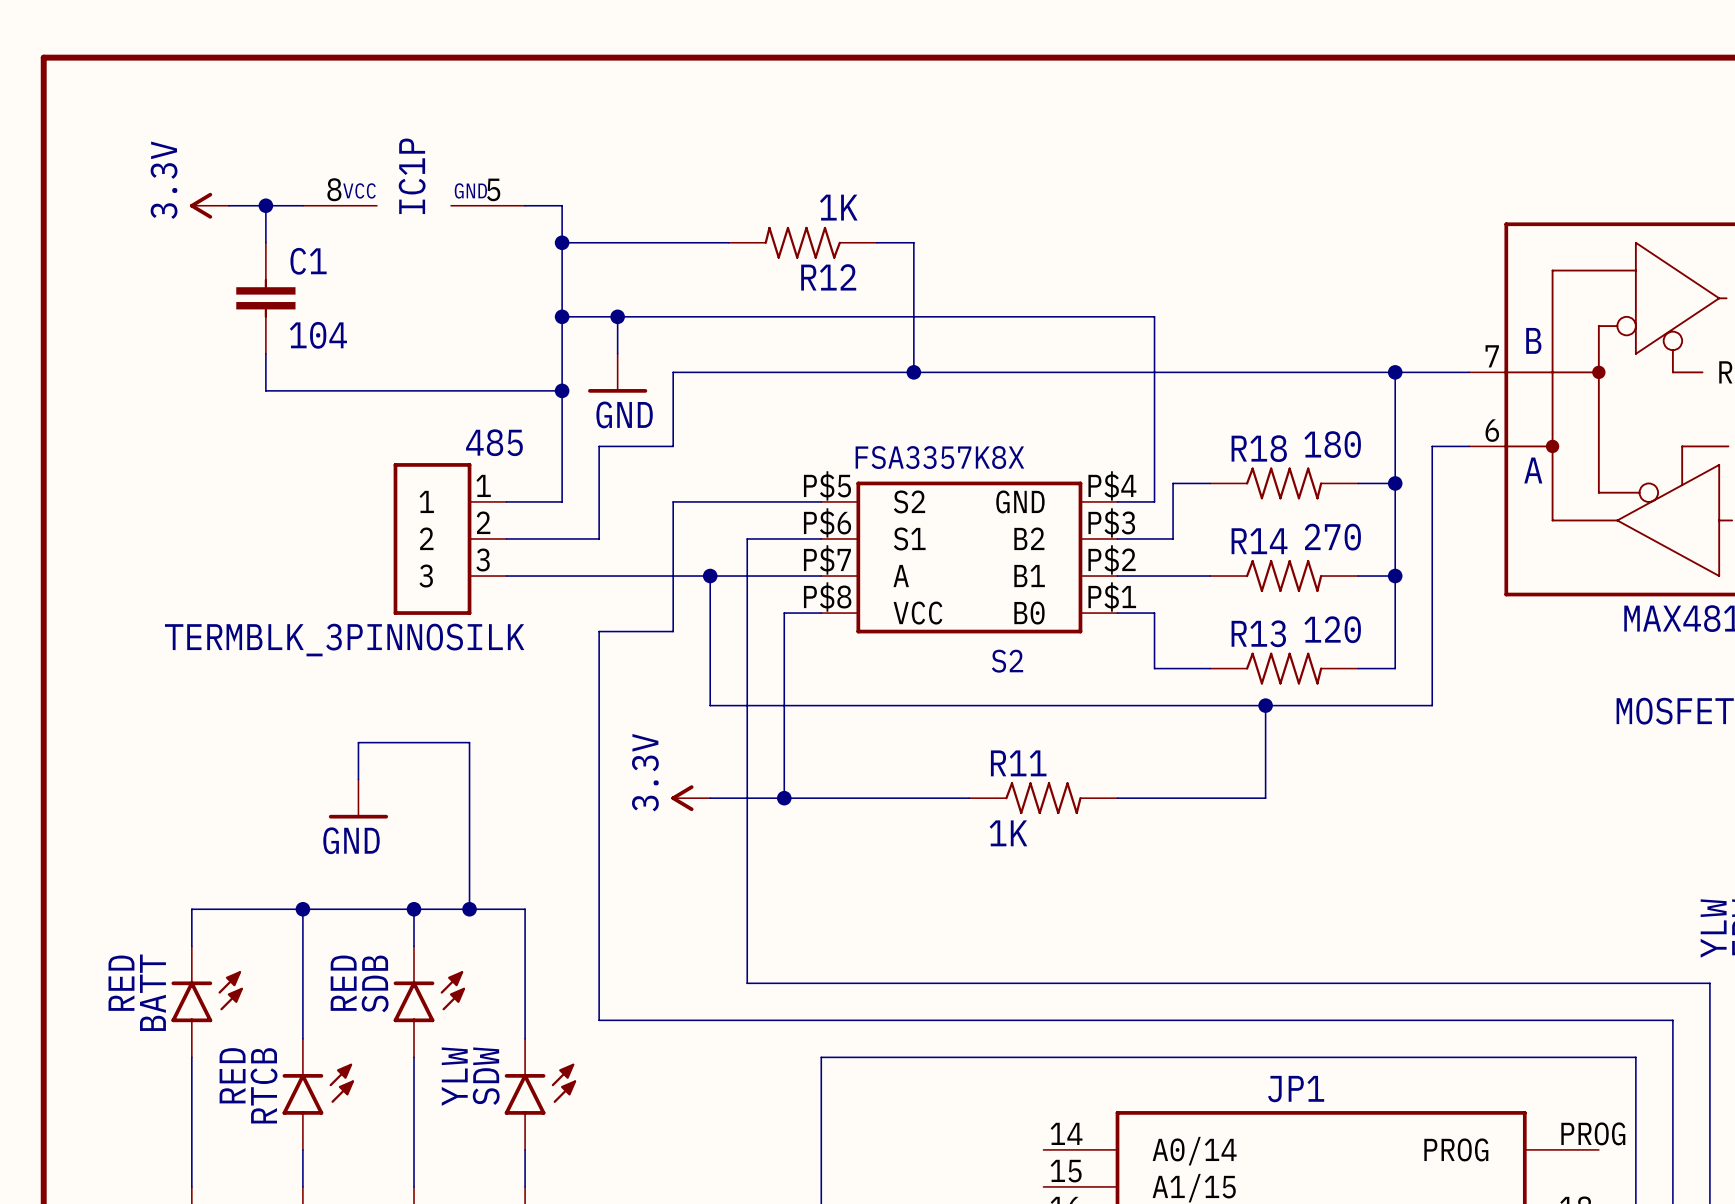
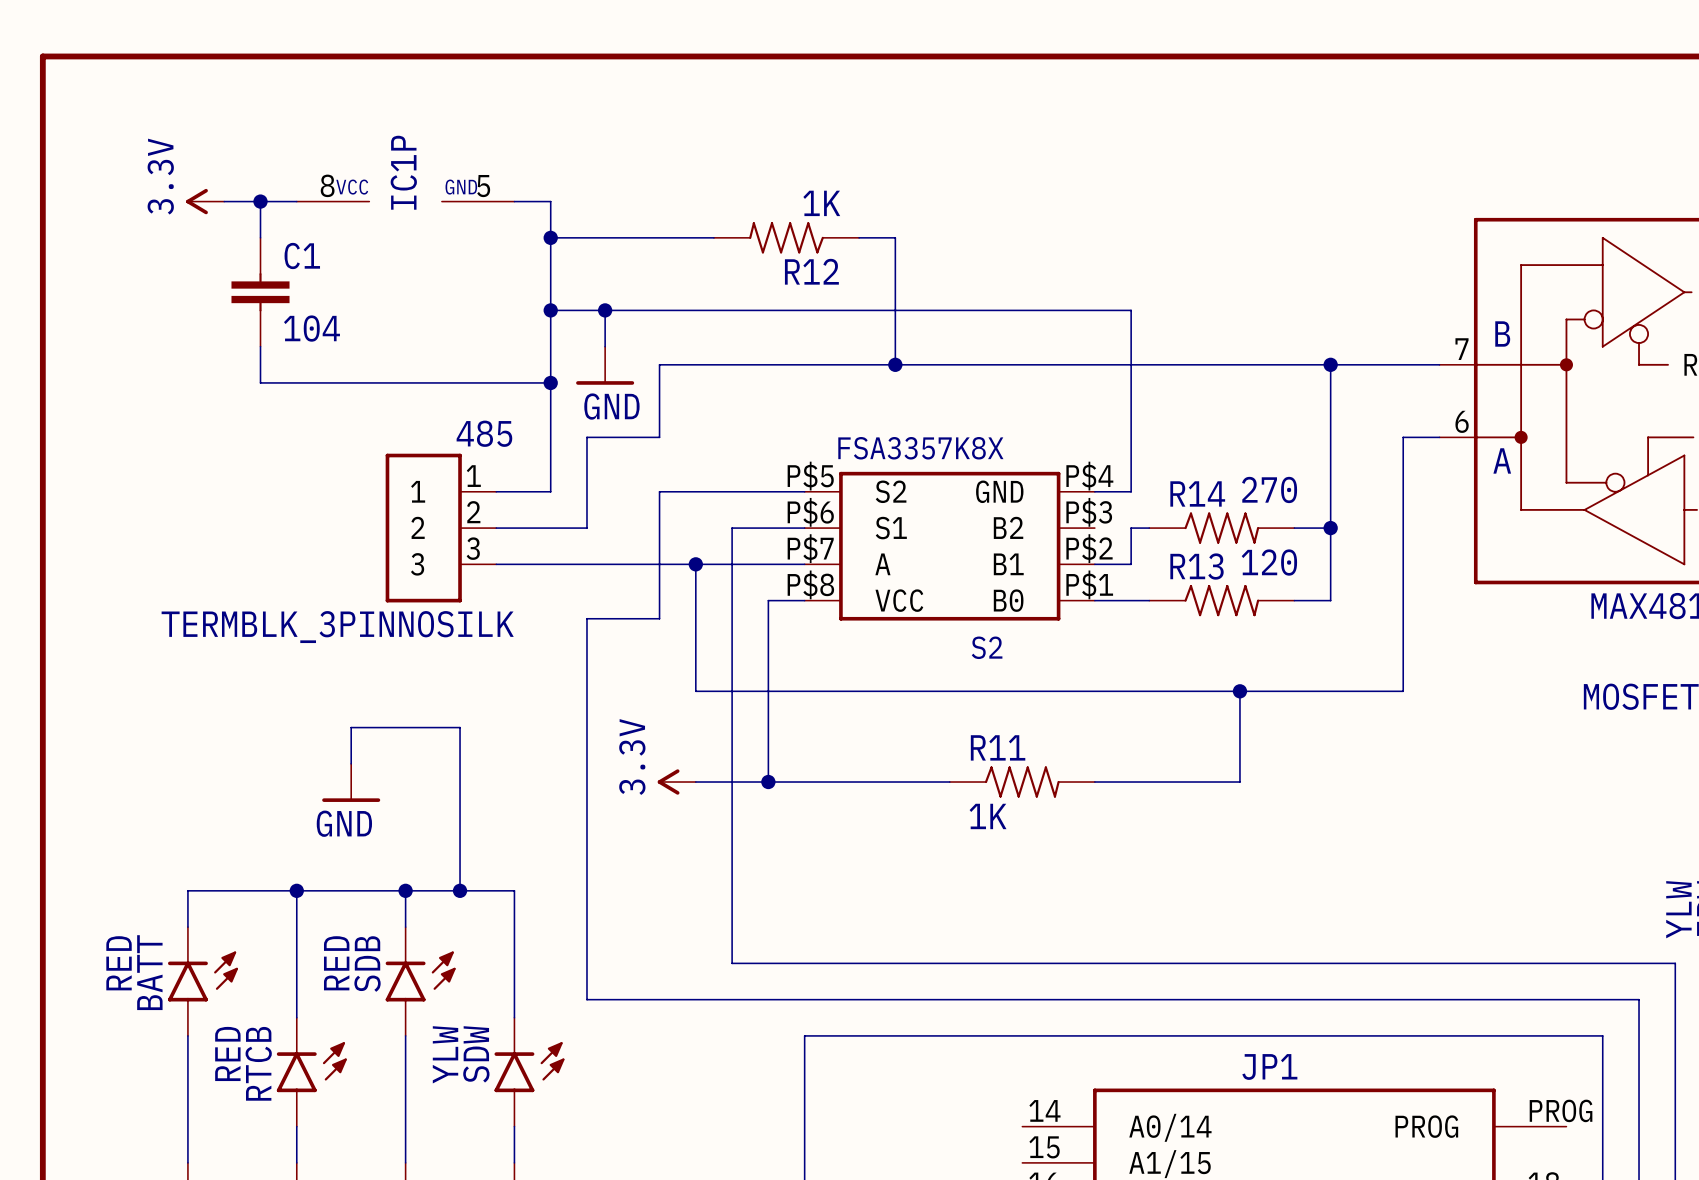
wire: none -> (1330, 364) (1330, 600) (1294, 600)
wire: (1395, 372) (1395, 668) (1358, 668) -> none
junction position: (1395, 372) -> (1330, 364)
wire: (1210, 483) (1173, 483) (1173, 538) -> none
R18: 180 (1284, 483) -> none
wire: (1358, 483) (1395, 483) -> none
junction: (1395, 483) -> none
wire: (1117, 538) (1154, 538) -> (1131, 564) (1131, 528)
junction: none -> (1330, 528)
wire: (1154, 576) (1210, 576) -> none
R14 position: (1284, 576) -> (1221, 528)
wire: (1358, 576) (1395, 576) -> (1294, 528) (1330, 528)
junction: (1395, 576) -> none
wire: (1154, 613) (1154, 668) (1210, 668) -> (1131, 600) (1149, 600)
R13 position: (1284, 668) -> (1221, 600)

